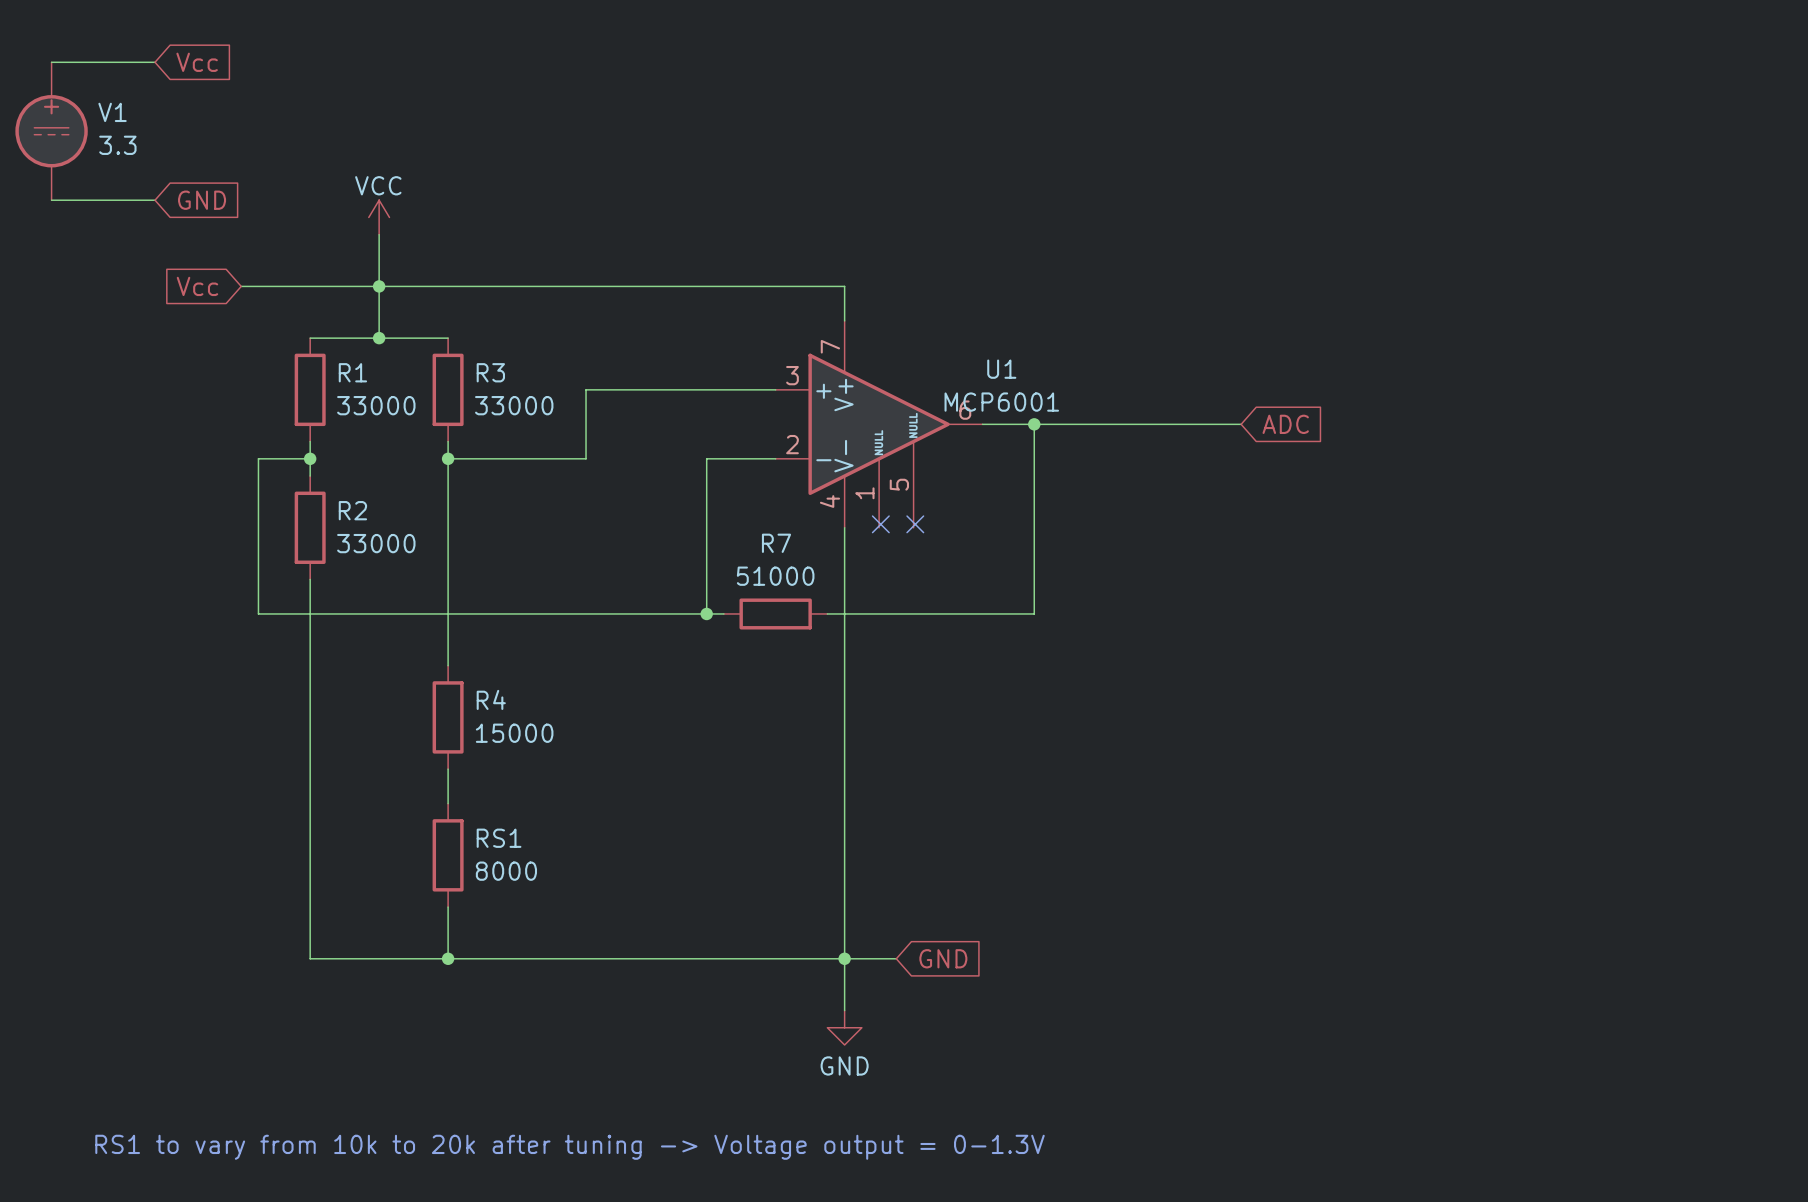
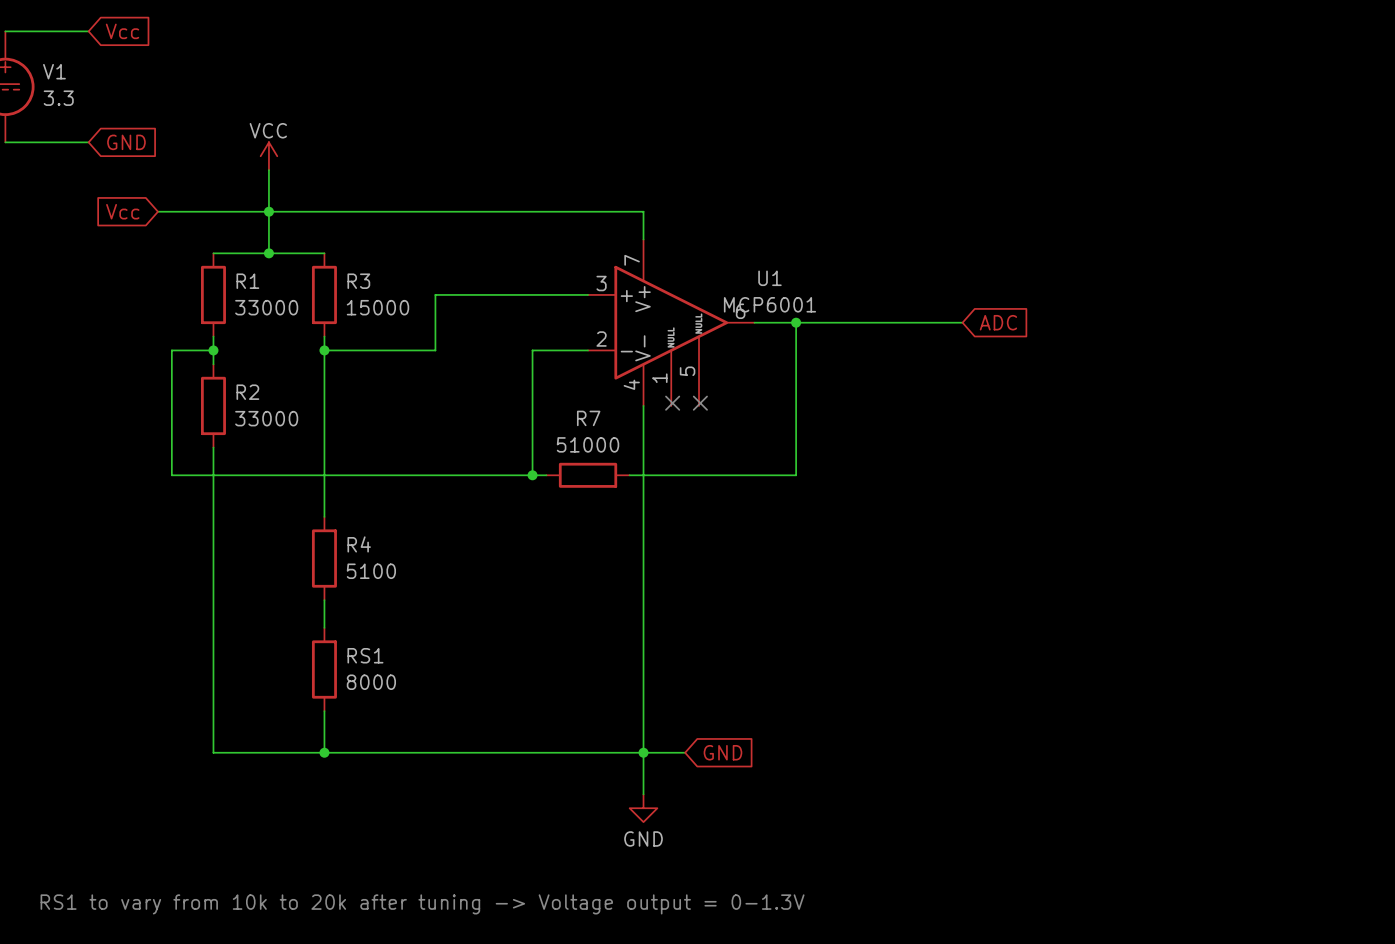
R3 value: 33000 (514, 405) -> 15000 (378, 307)
R4 value: 15000 (514, 733) -> 5100 (371, 571)

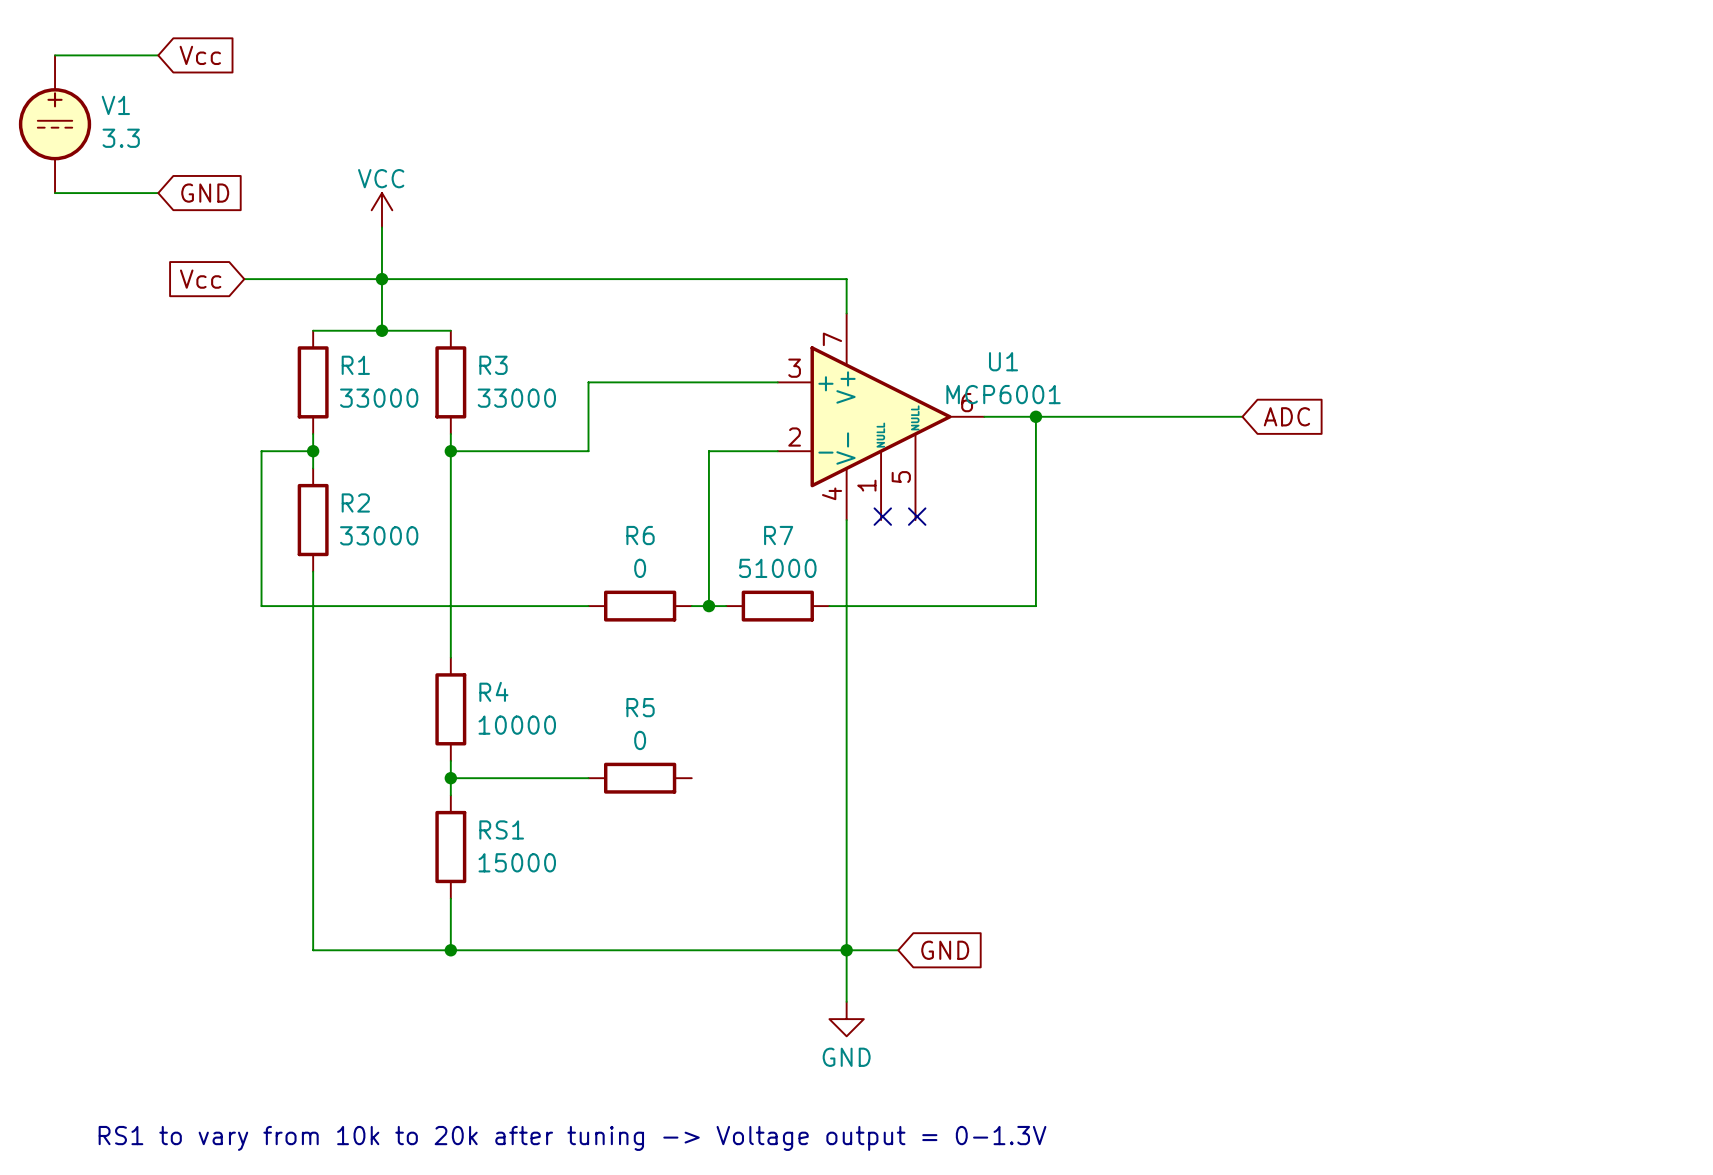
R3 value: 15000 (378, 307) -> 33000 (516, 398)
wire: (435, 475) (518, 475) -> none
R6: none -> 0 (640, 606)
R4 value: 5100 (371, 571) -> 10000 (517, 725)
wire: none -> (450, 778) (588, 778)
junction: none -> (450, 778)
R5: none -> 0 (640, 778)
RS1 value: 8000 (371, 682) -> 15000 (517, 862)

